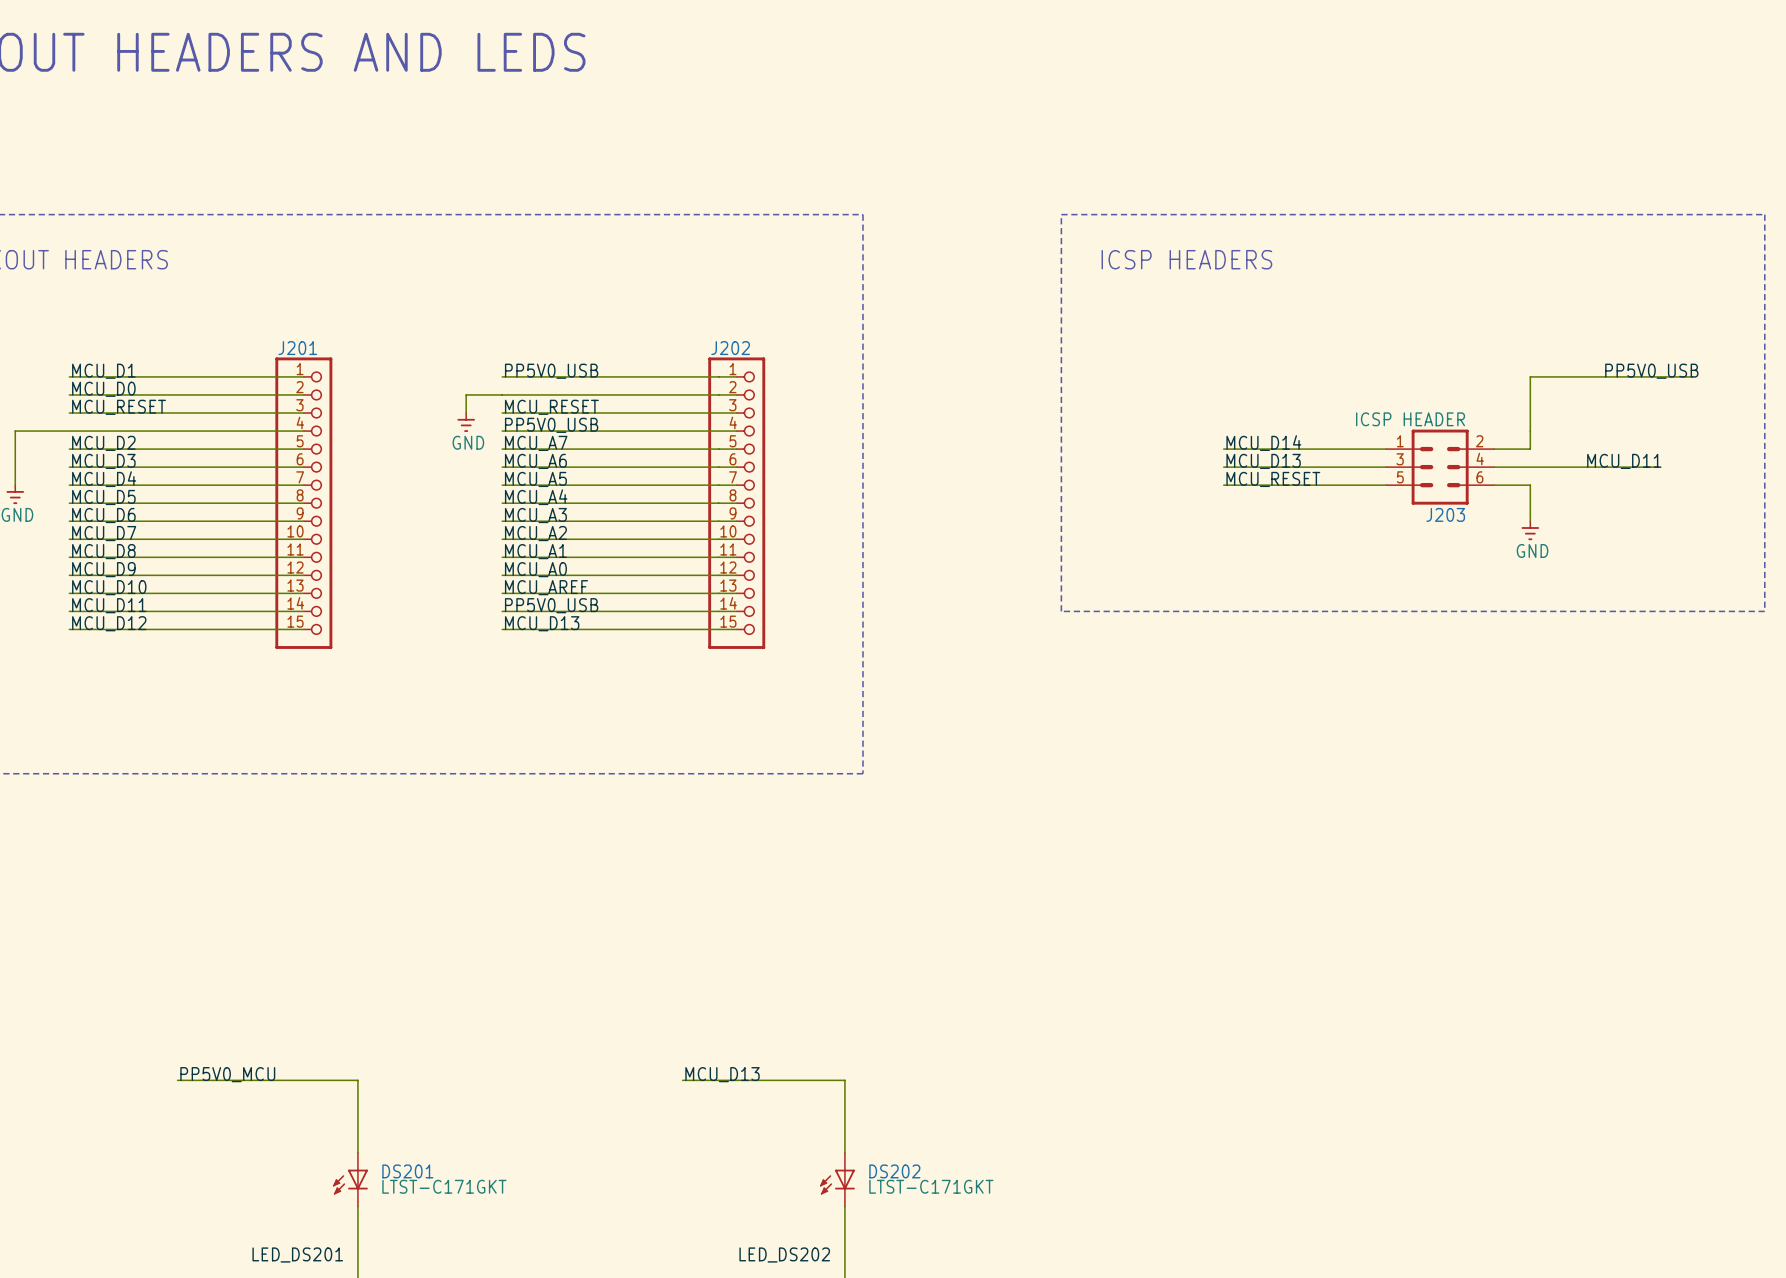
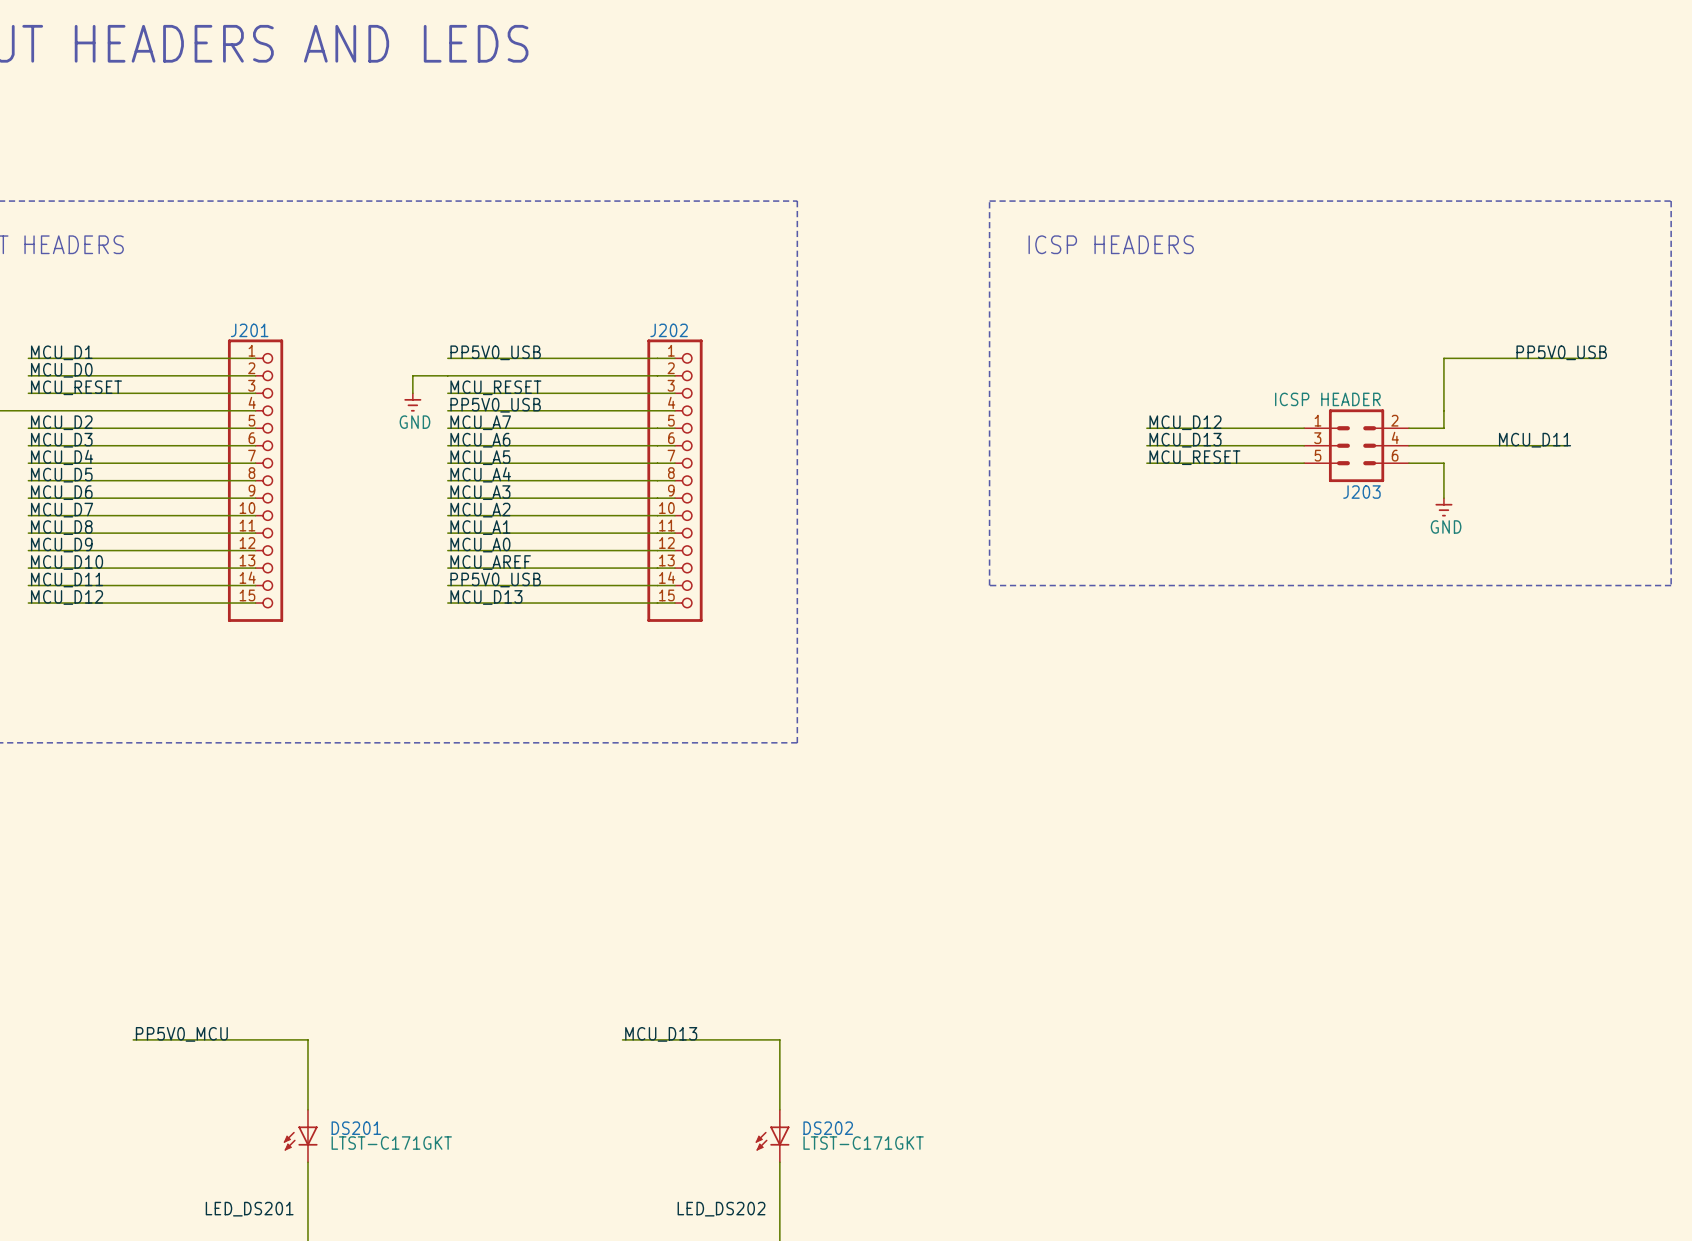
label: MCU_D14 (1263, 443) -> MCU_D12 (1185, 422)

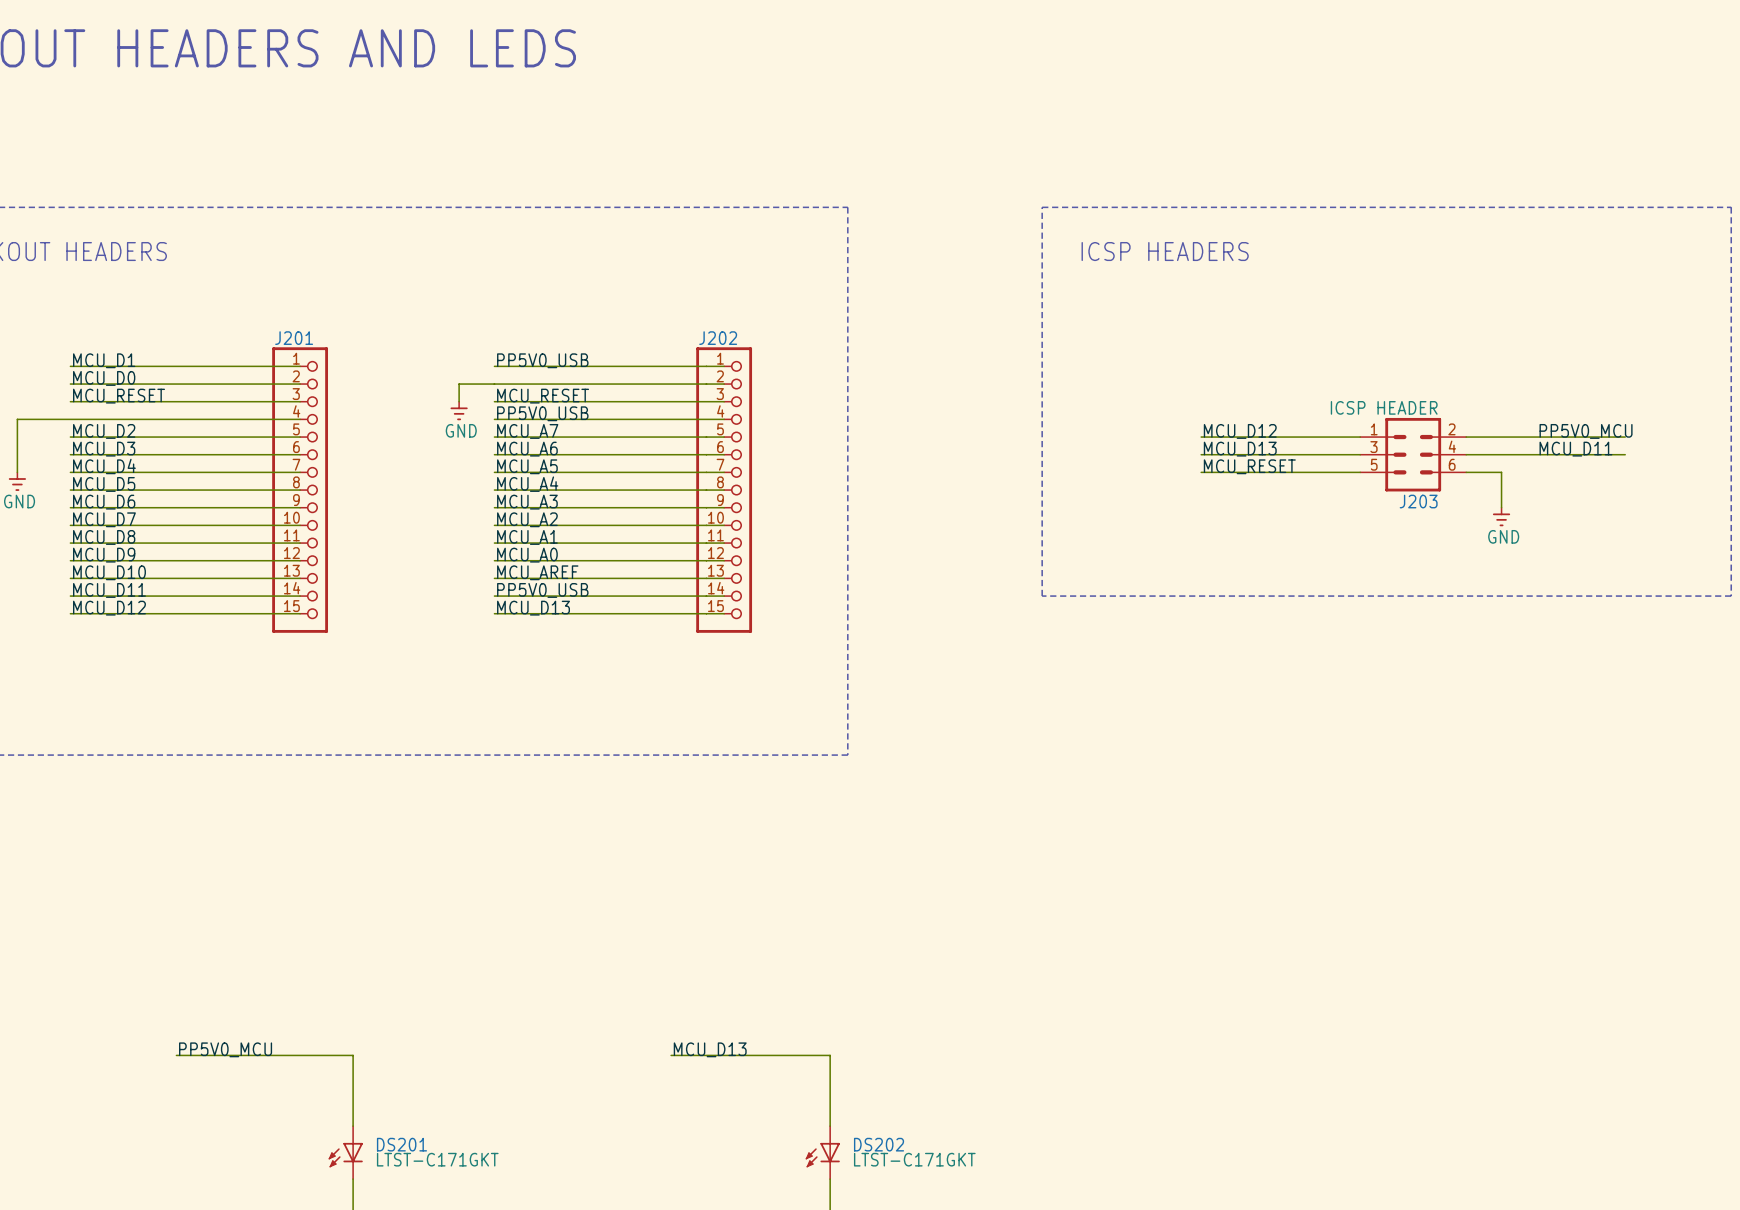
label: PP5V0_USB (1561, 352) -> none
wire: (1601, 358) (1443, 358) (1443, 428) -> (1625, 437) (1501, 437)
label: none -> PP5V0_MCU (1586, 431)
label position: MCU_D11 (1535, 440) -> MCU_D11 (1575, 449)

